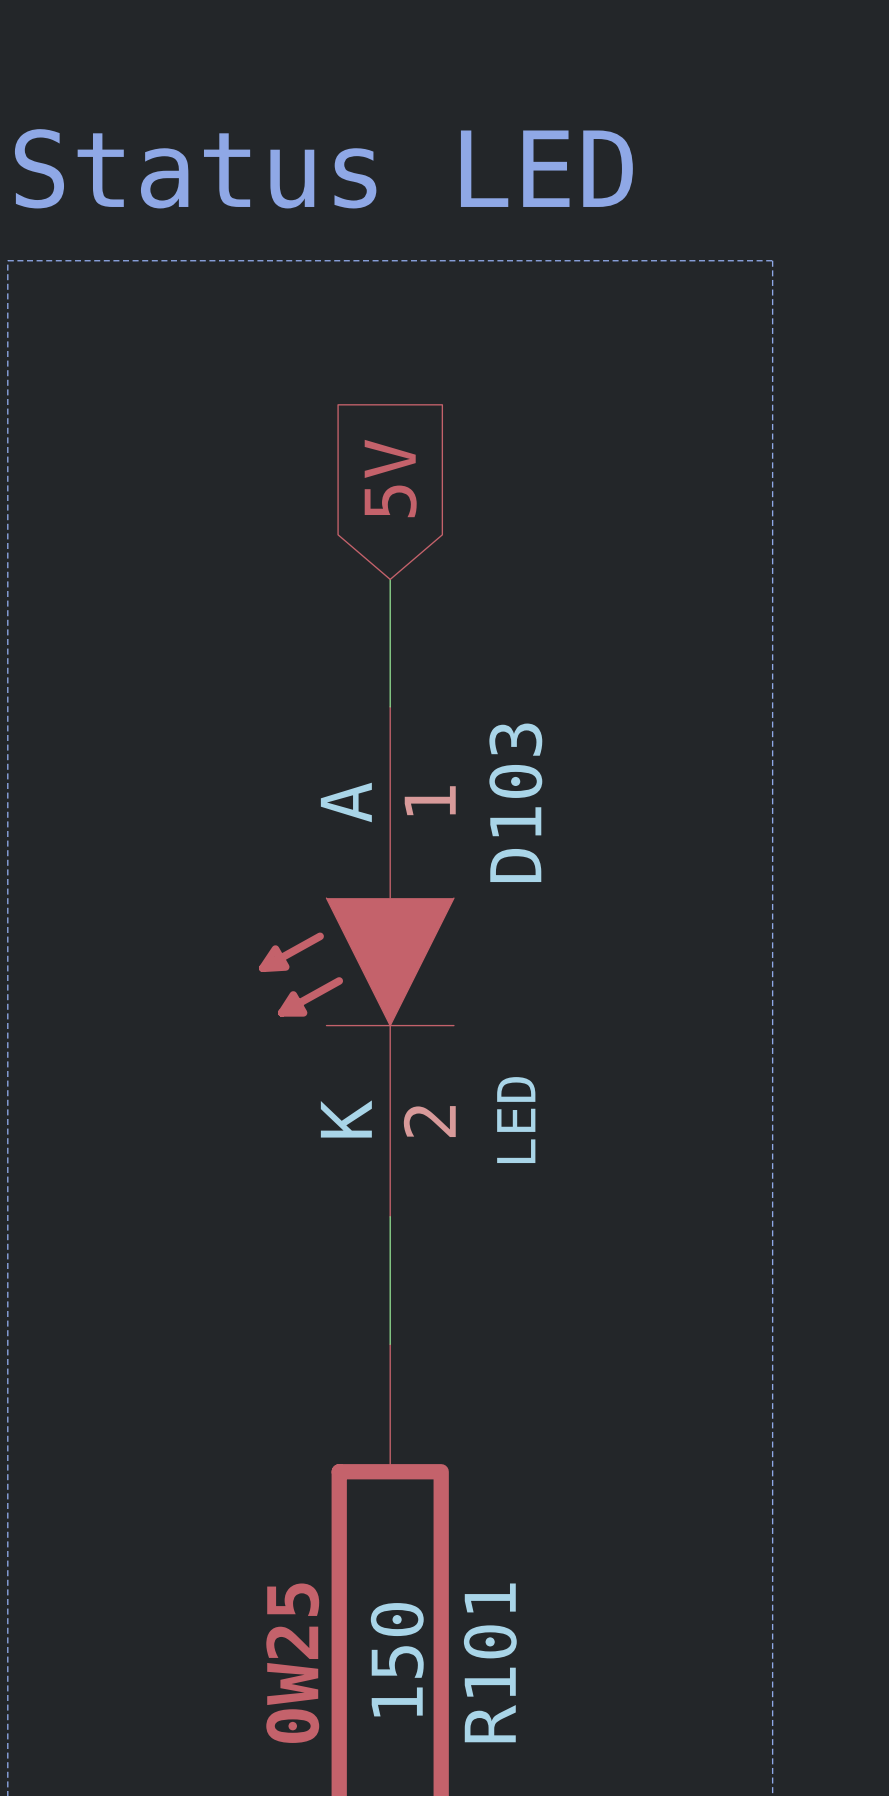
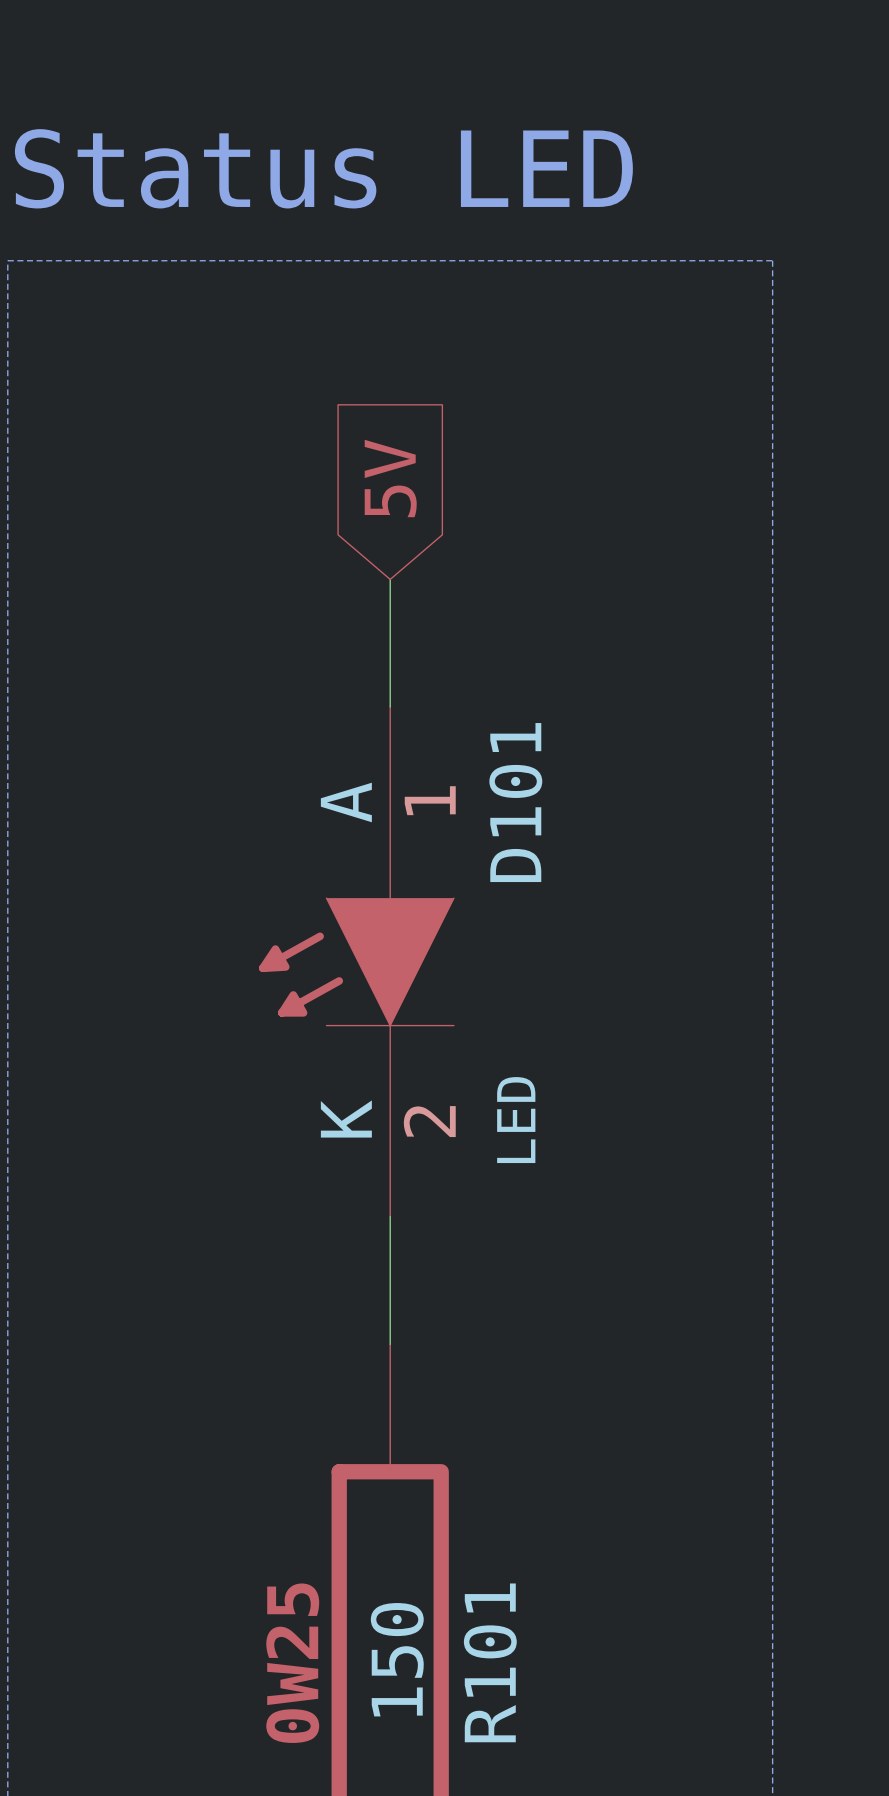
D103 name: D103 (515, 802) -> D101 (515, 802)

